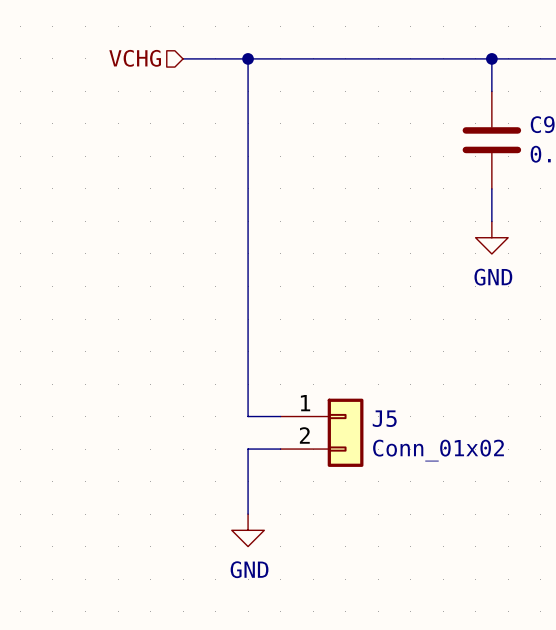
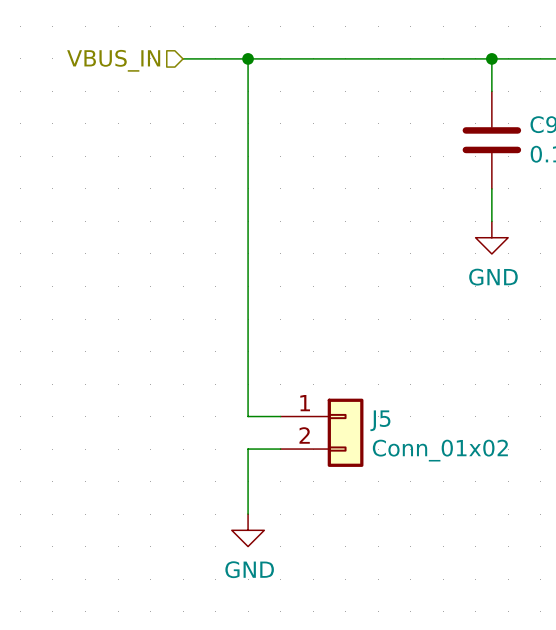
hierarchical label: VCHG (135, 58) -> VBUS_IN (113, 60)

